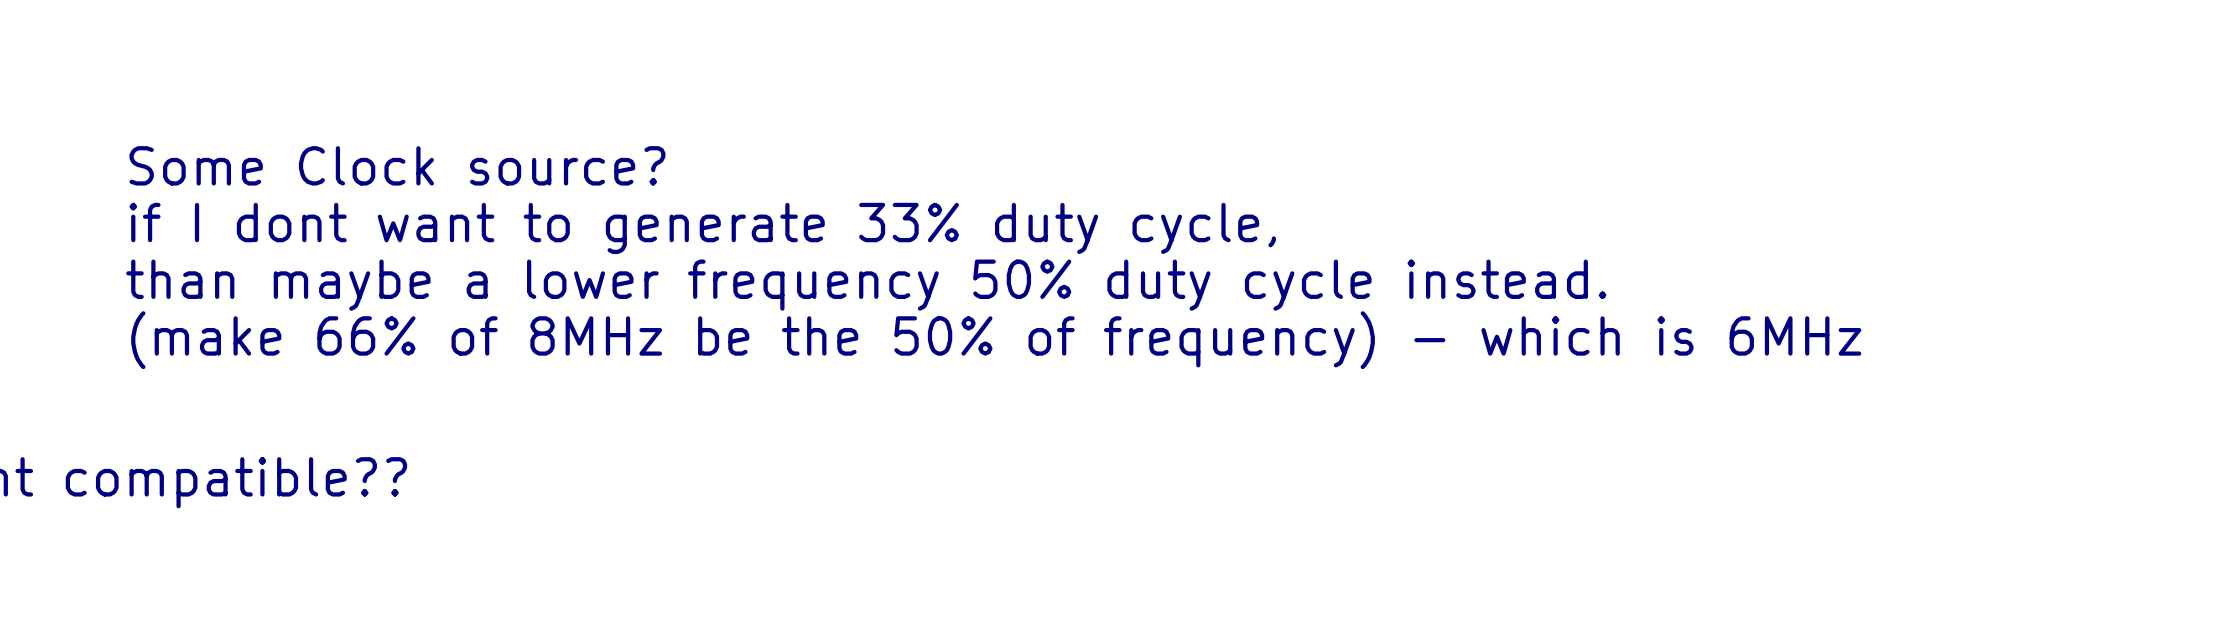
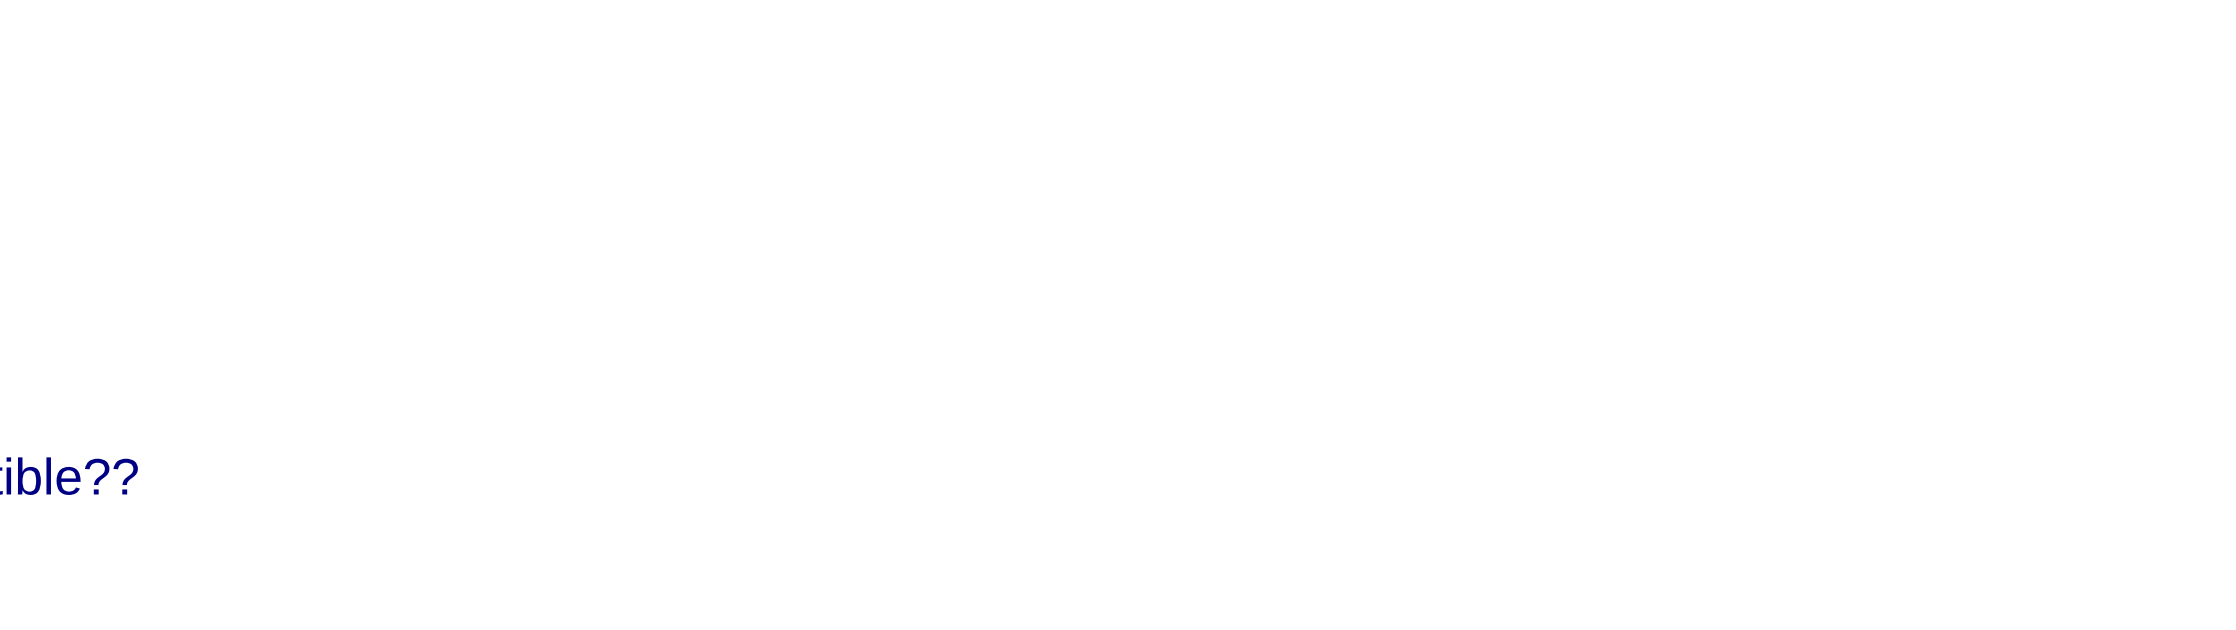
text: Some Clock source? (397, 165) -> none
text: if I dont want to generate 33% duty cycle, (702, 228) -> none
text: than maybe a lower frequency 50% duty cycle instead. (866, 285) -> none
text: (make 66% of 8MHz be the 50% of frequency) - which is 6MHz (996, 340) -> none

